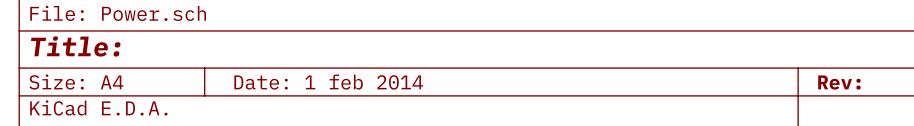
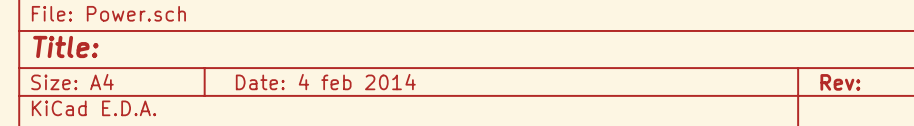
title block: Date: 1 feb 2014 (328, 82) -> Date: 4 feb 2014 (325, 82)

